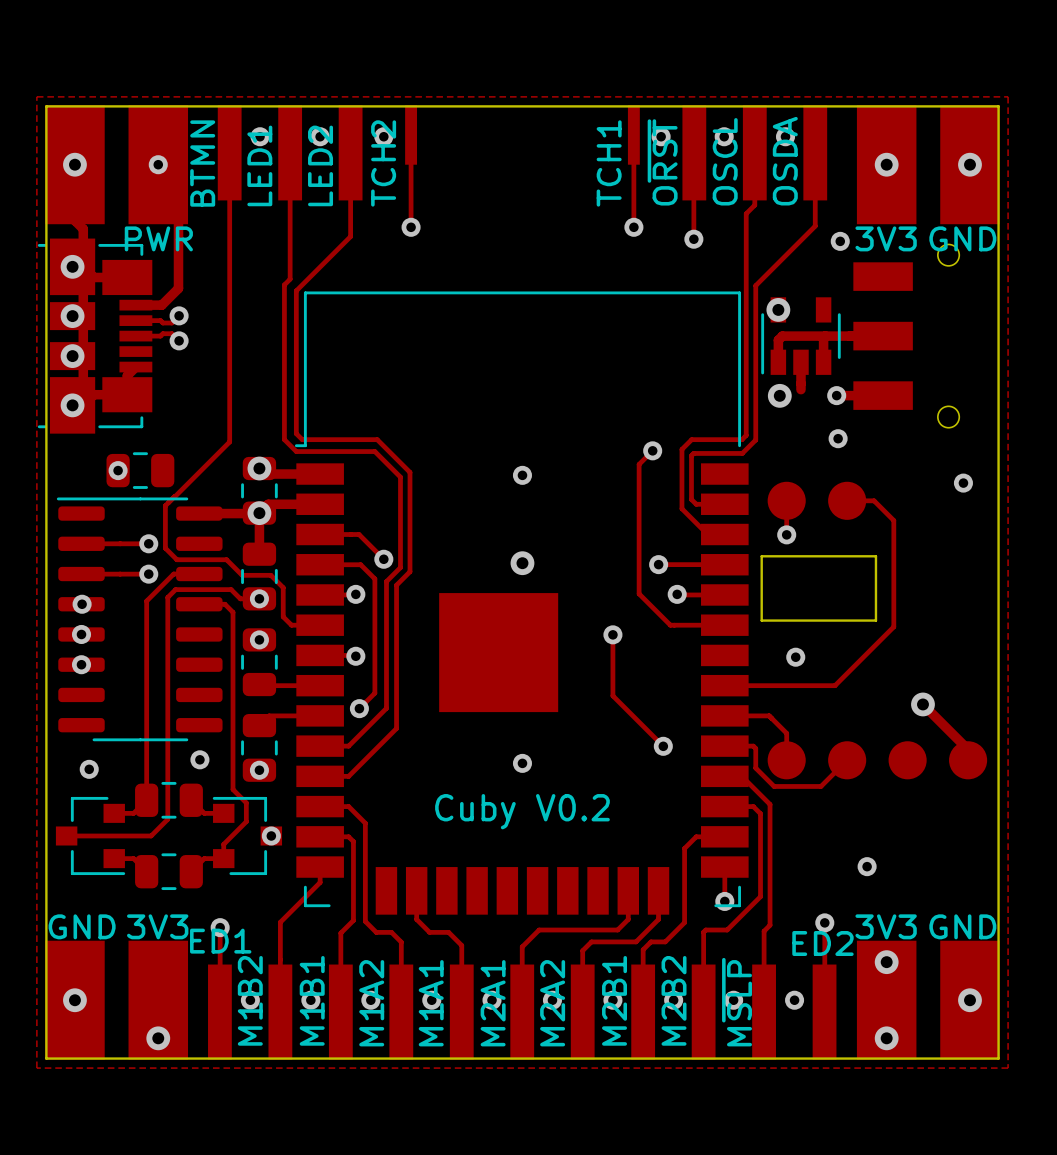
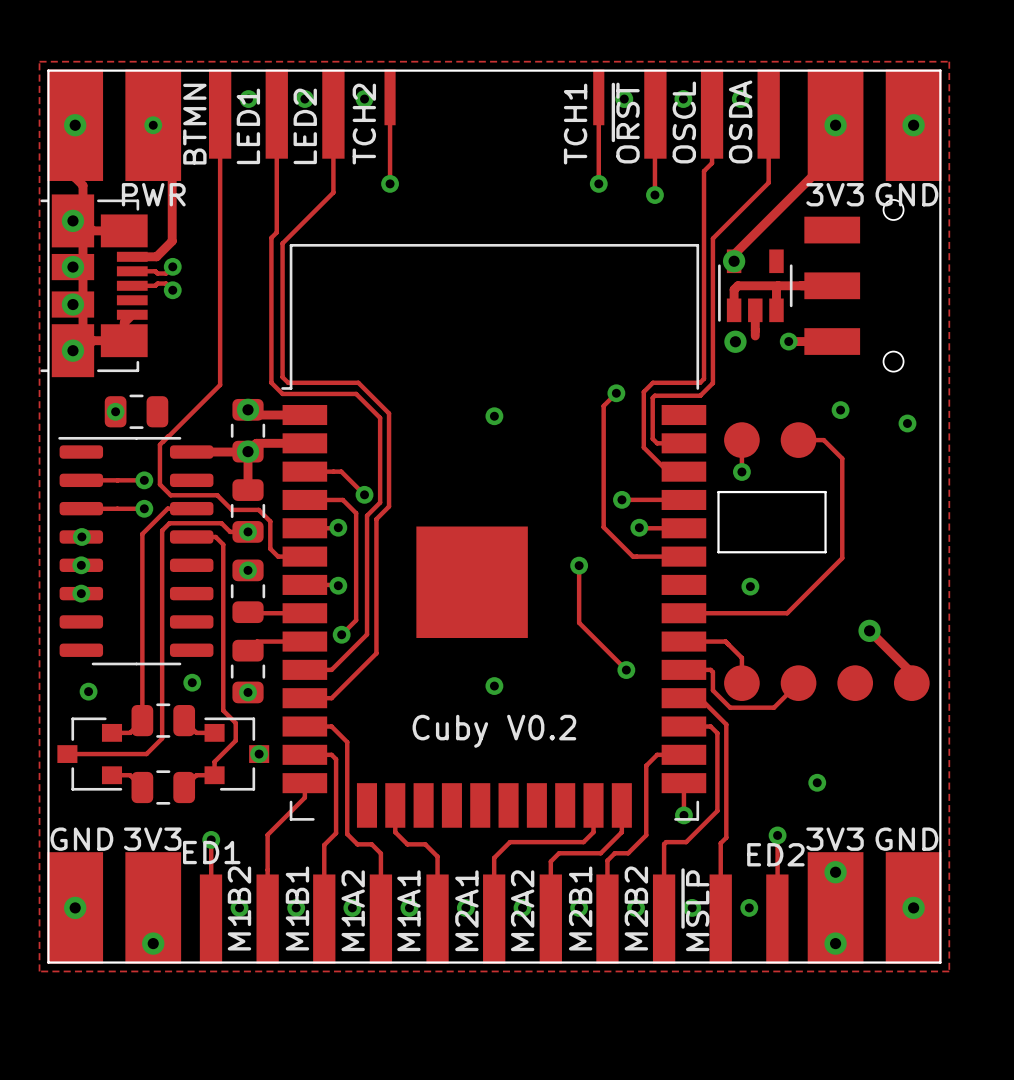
track: none -> (835, 153) (734, 254) (734, 261)
via: (840, 241) -> none
via position: (838, 438) -> (840, 410)
via: (522, 563) -> none

